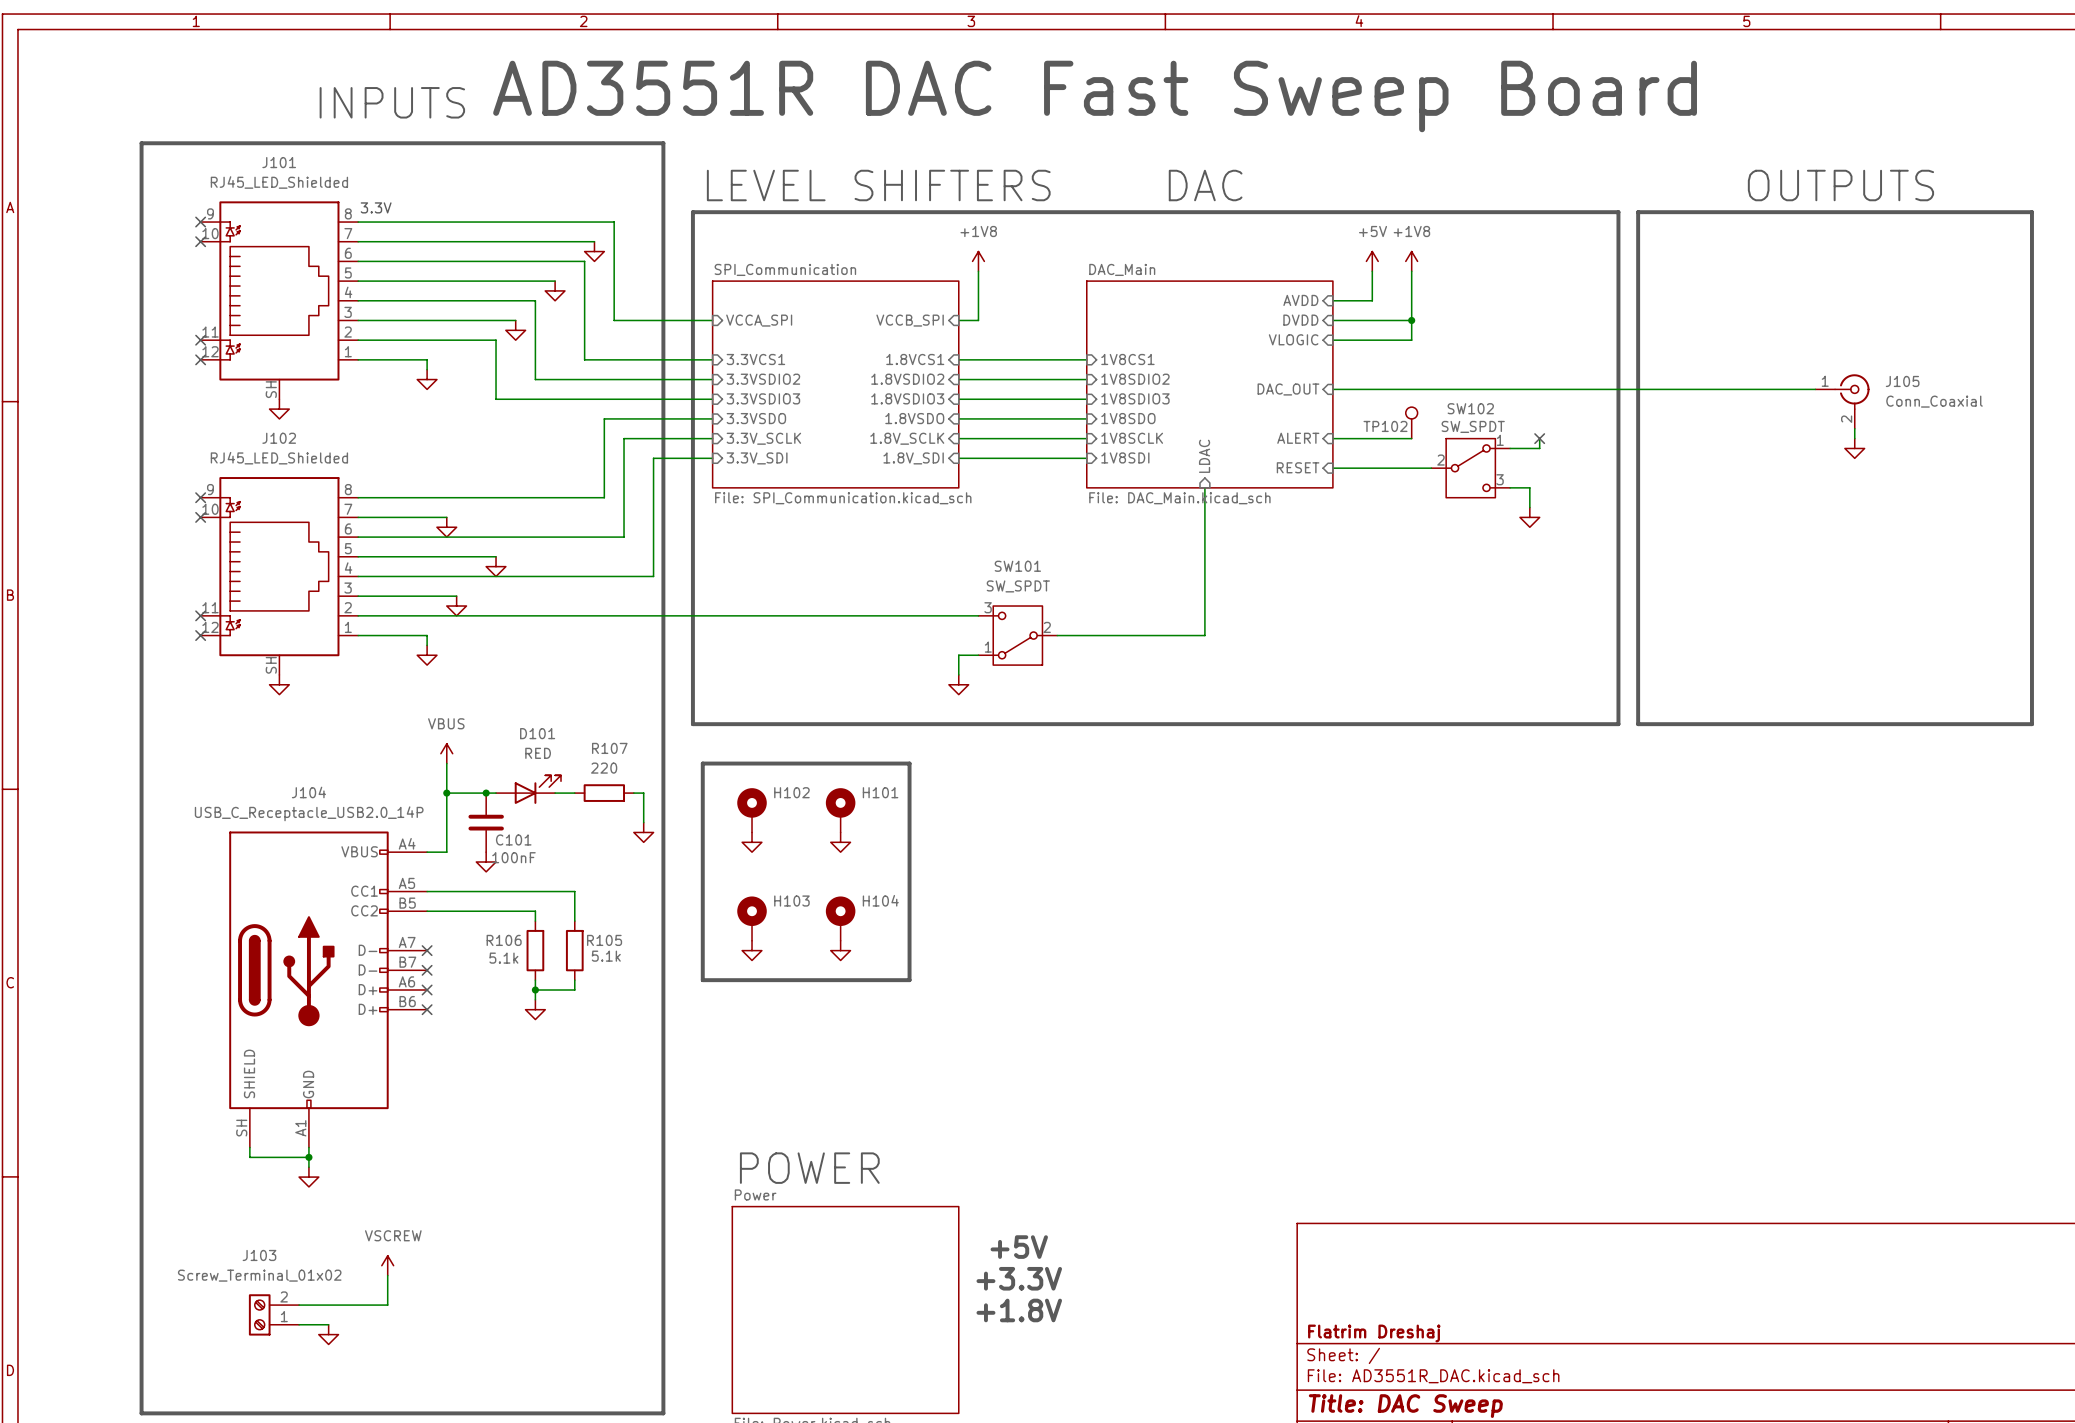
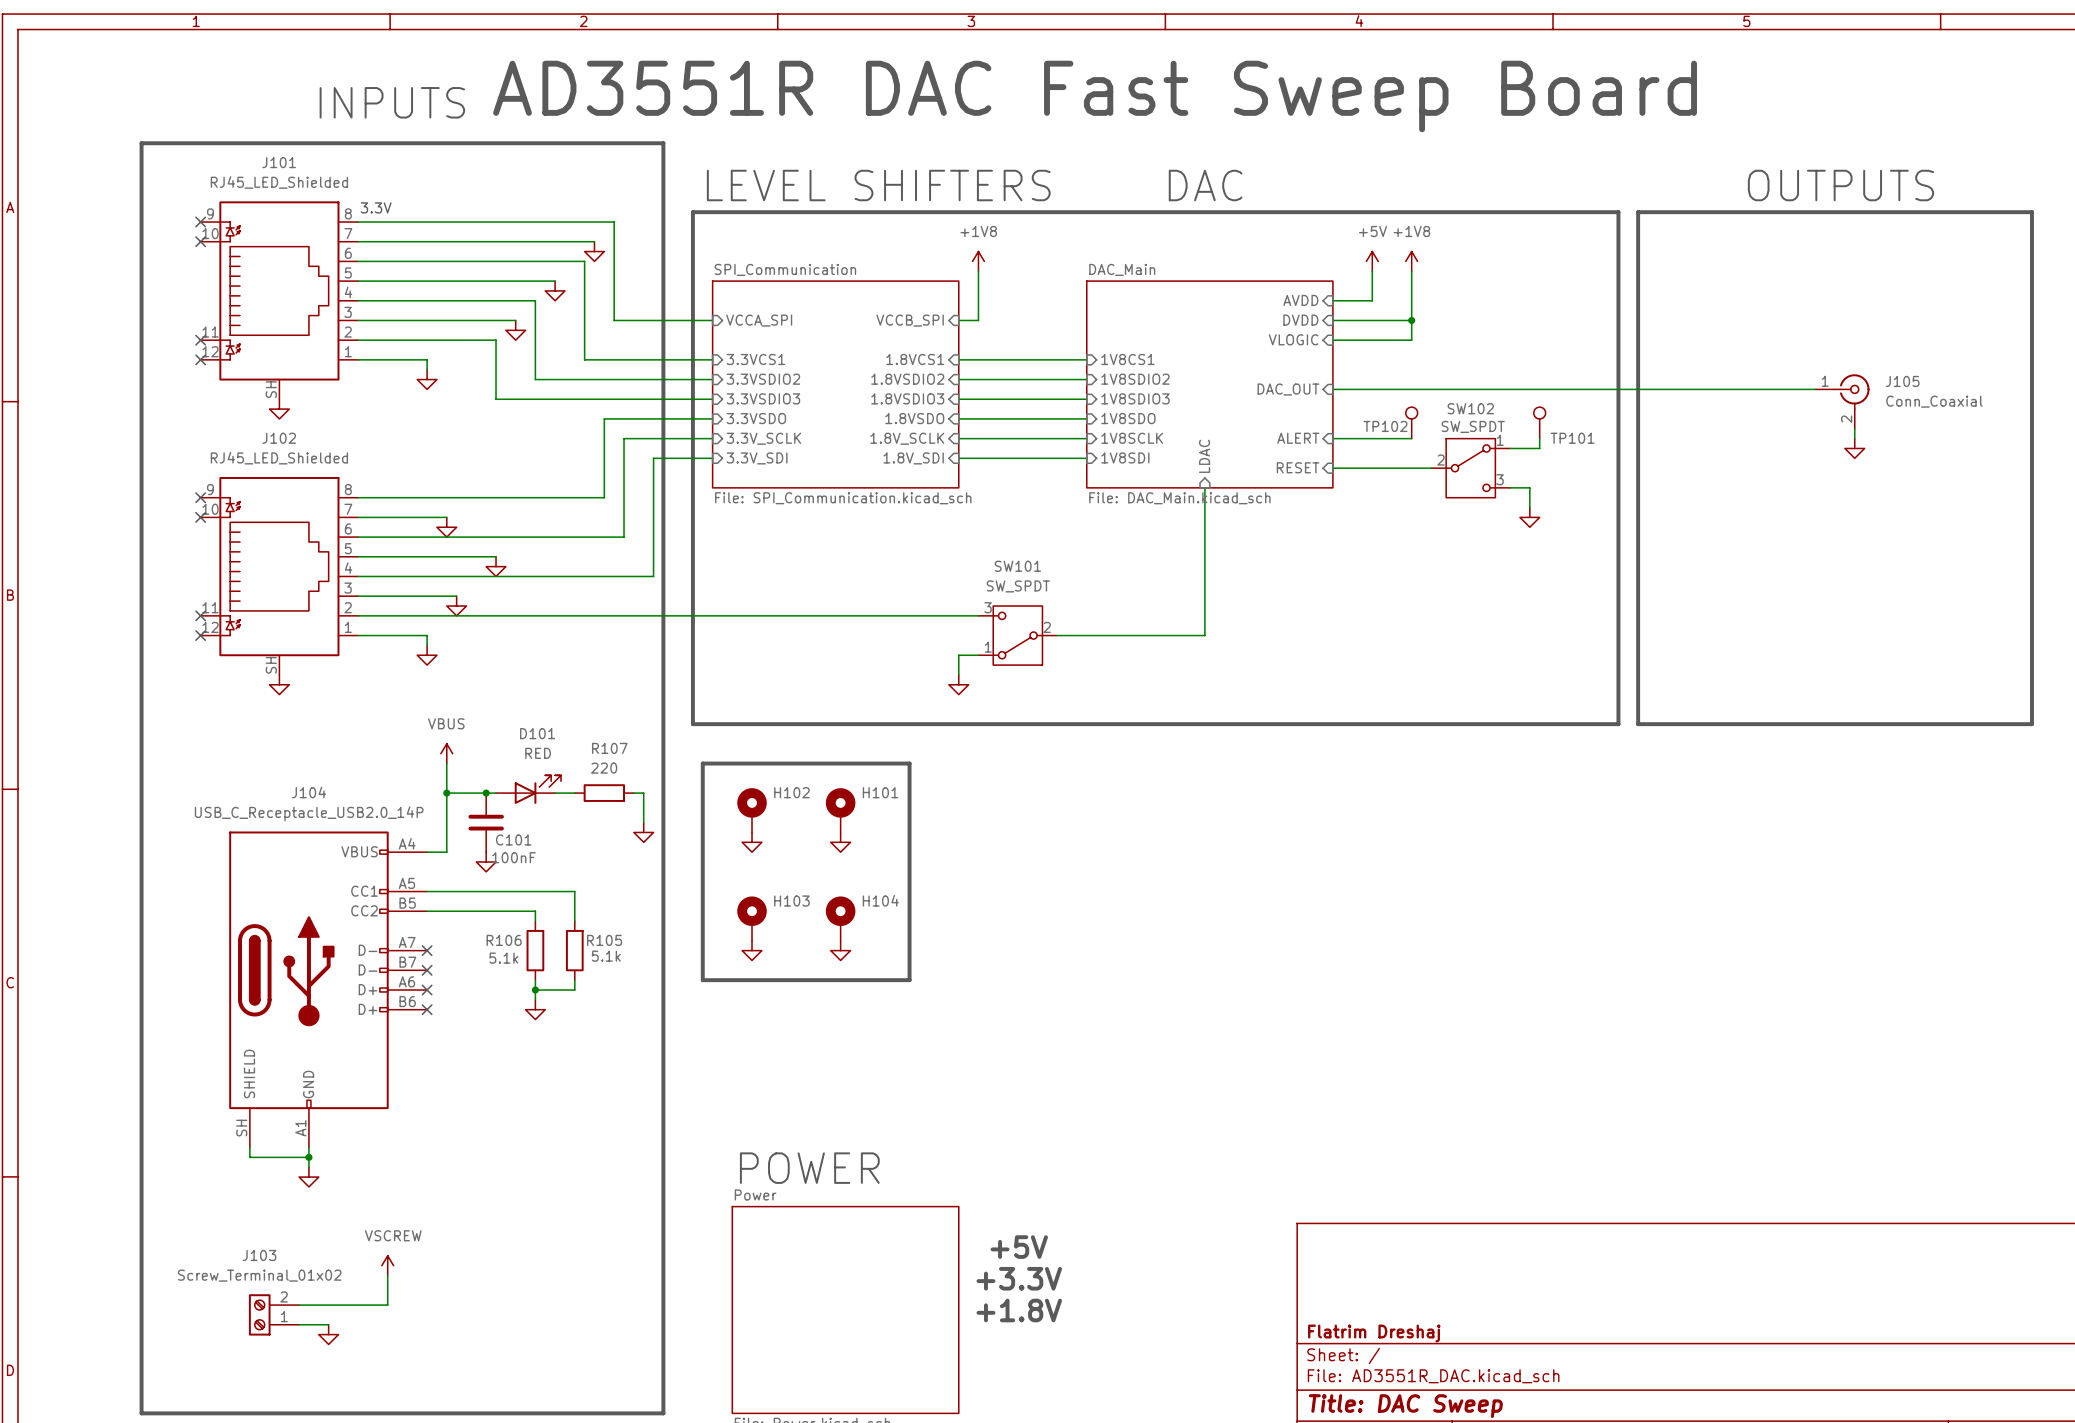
TP101: none -> (1539, 422)
no-connect mark: (1539, 438) -> none

